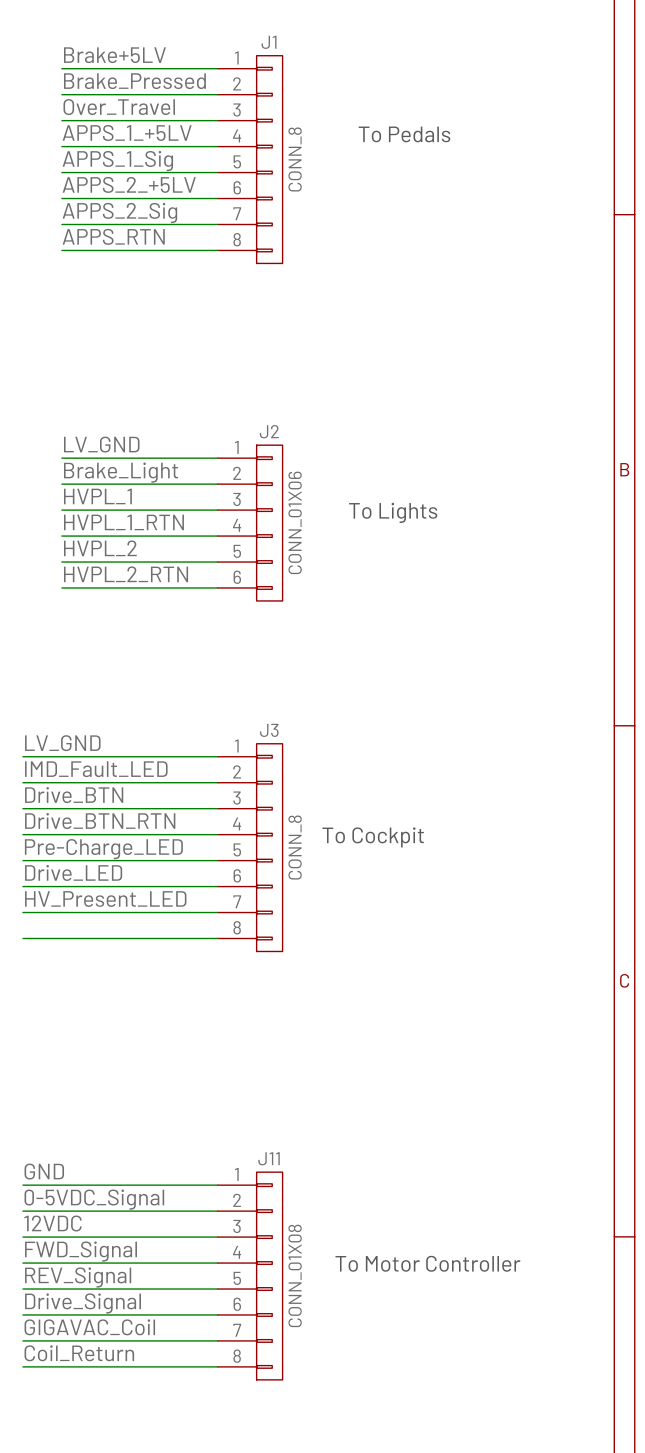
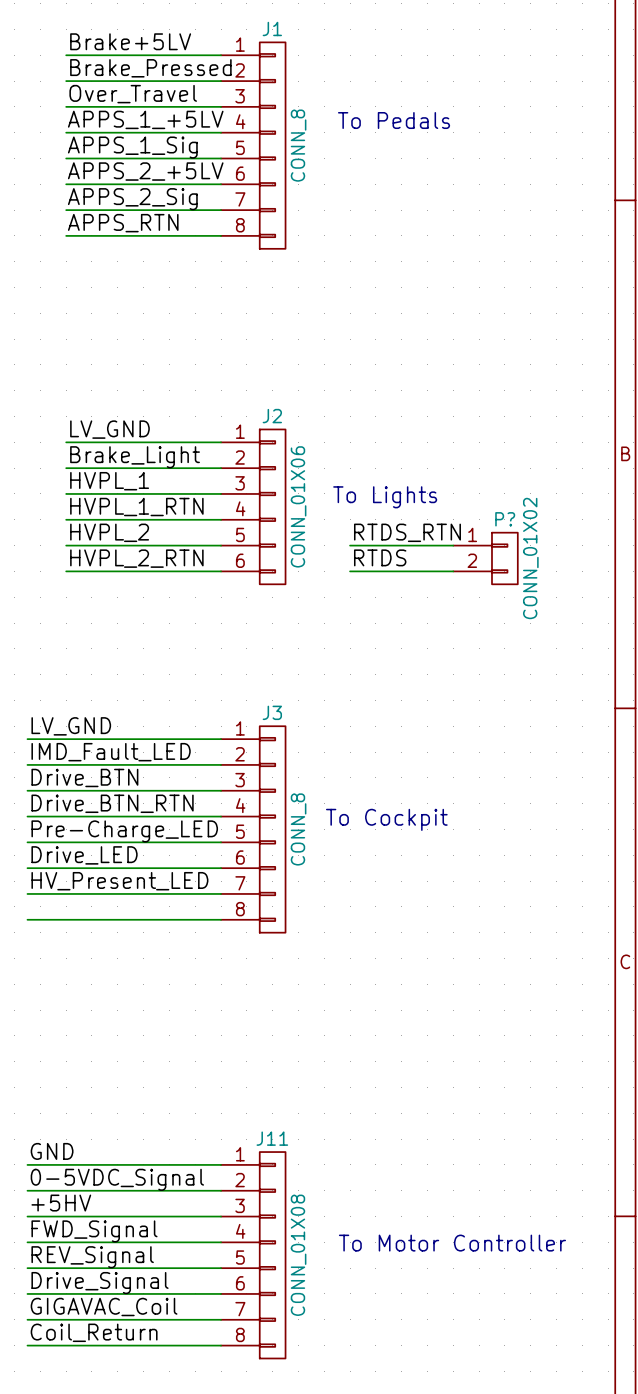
label: none -> RTDS_RTN (407, 532)
wire: none -> (350, 545) (453, 545)
label: none -> RTDS (380, 557)
P?: none -> CONN_01X02 (485, 558)
wire: none -> (350, 571) (453, 571)
label: 12VDC (52, 1223) -> +5HV (61, 1203)

